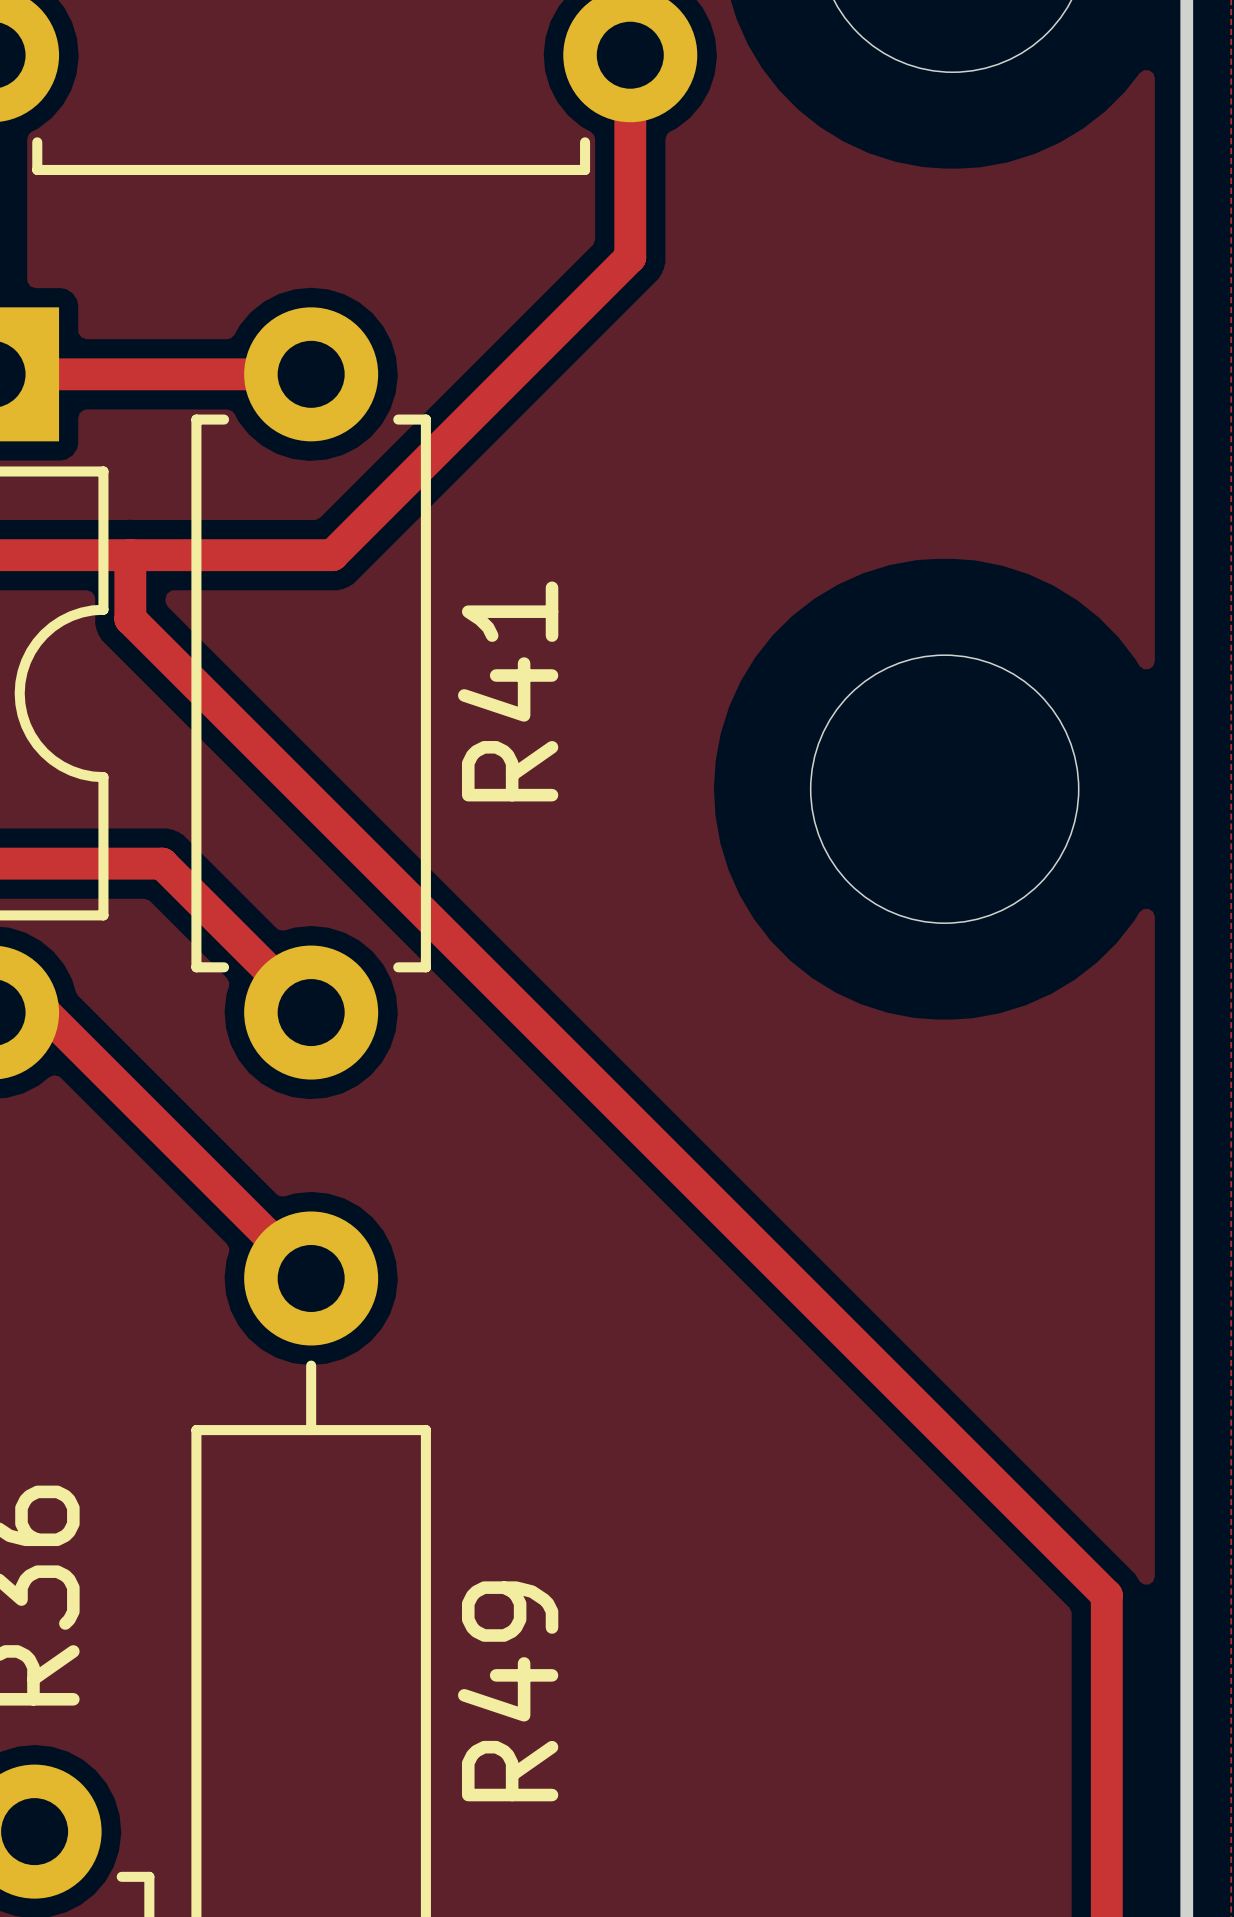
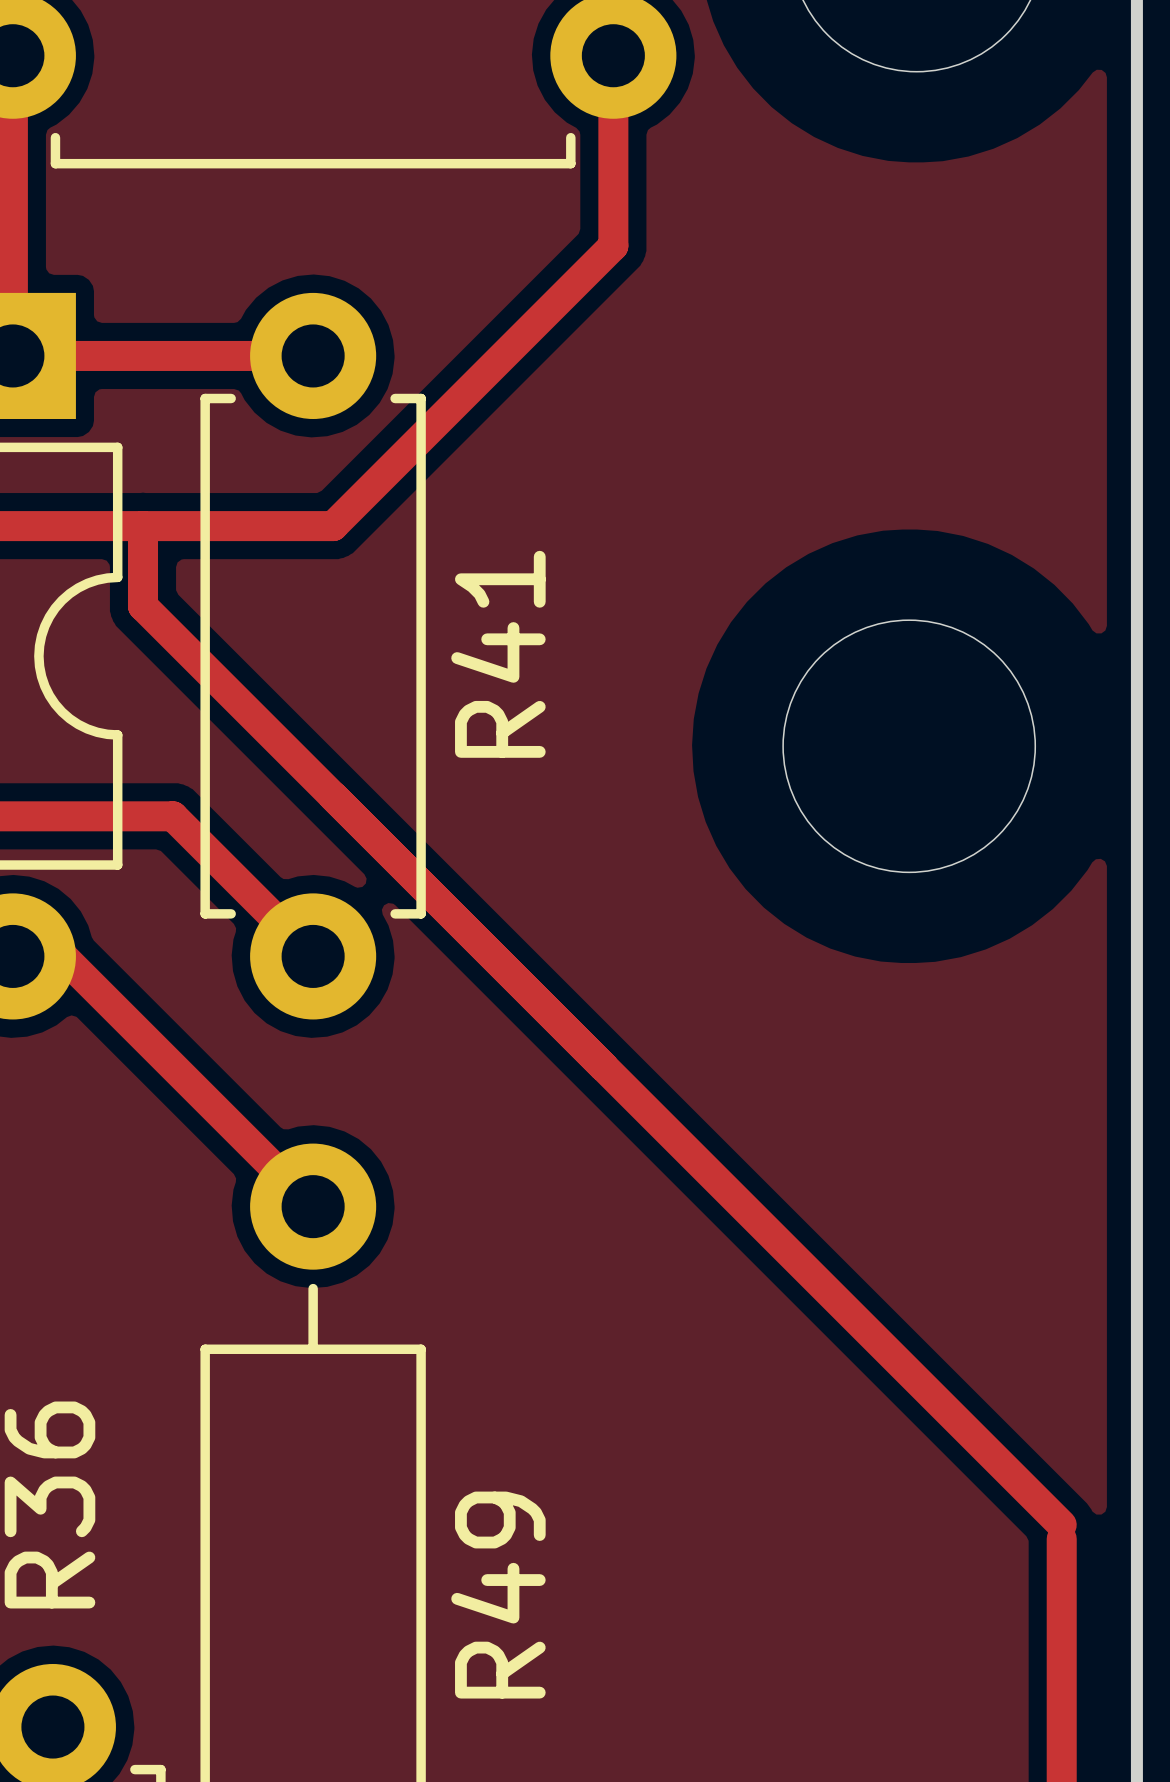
track: (130, 618) (1106, 1595) (1106, 1631) -> (142, 586) (142, 606) (1061, 1524)

